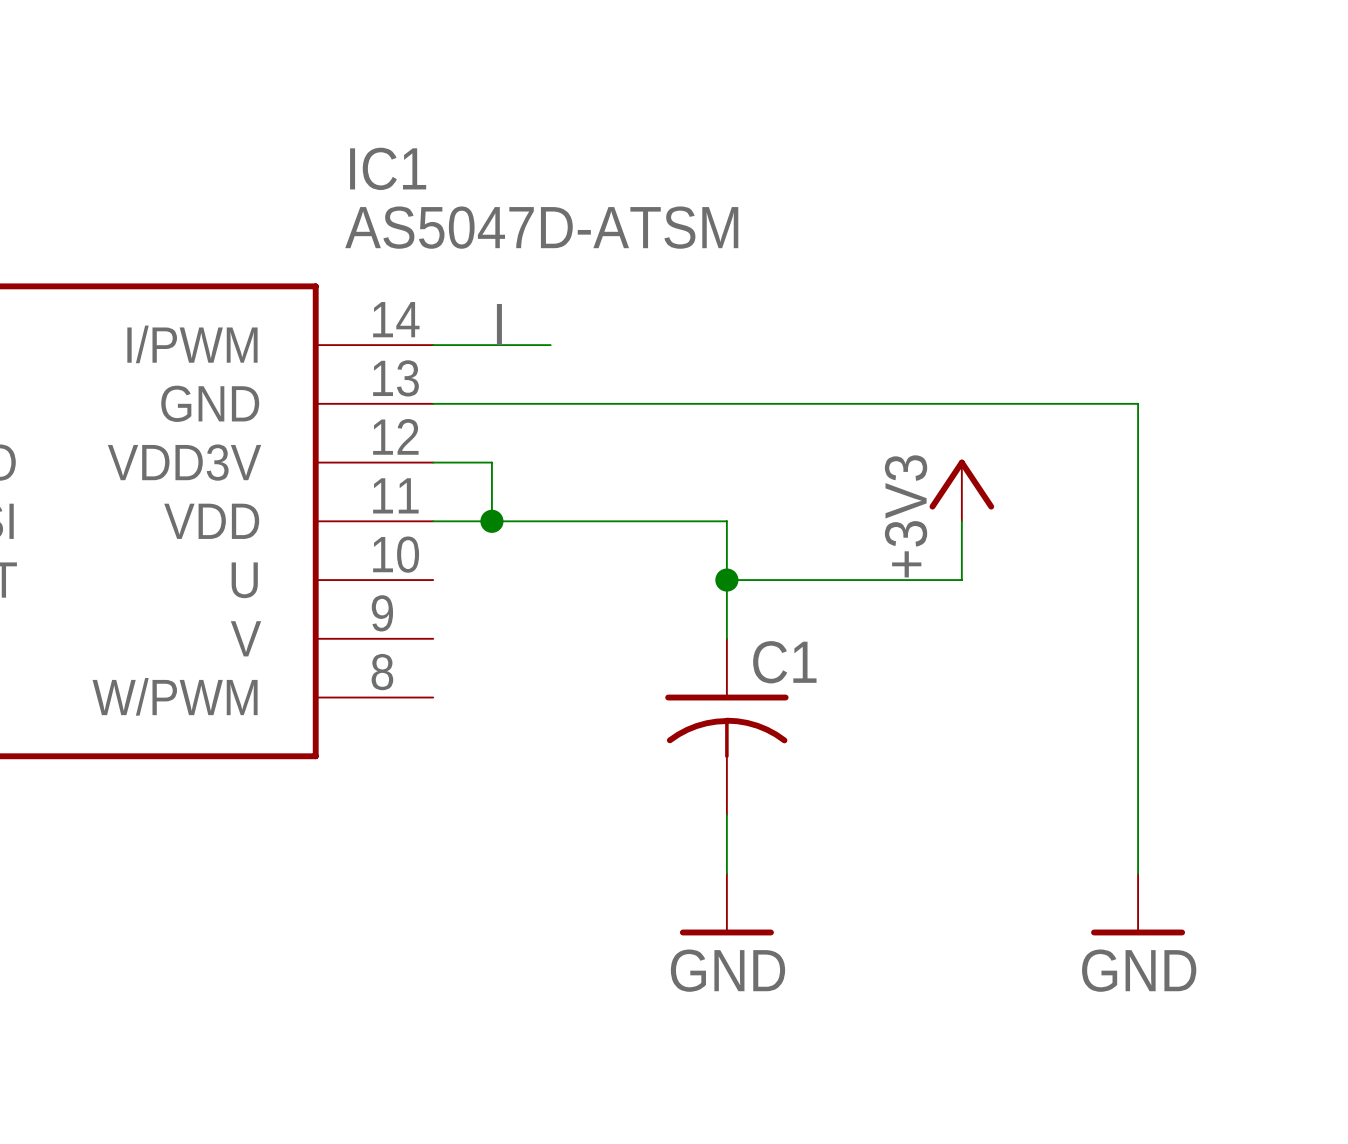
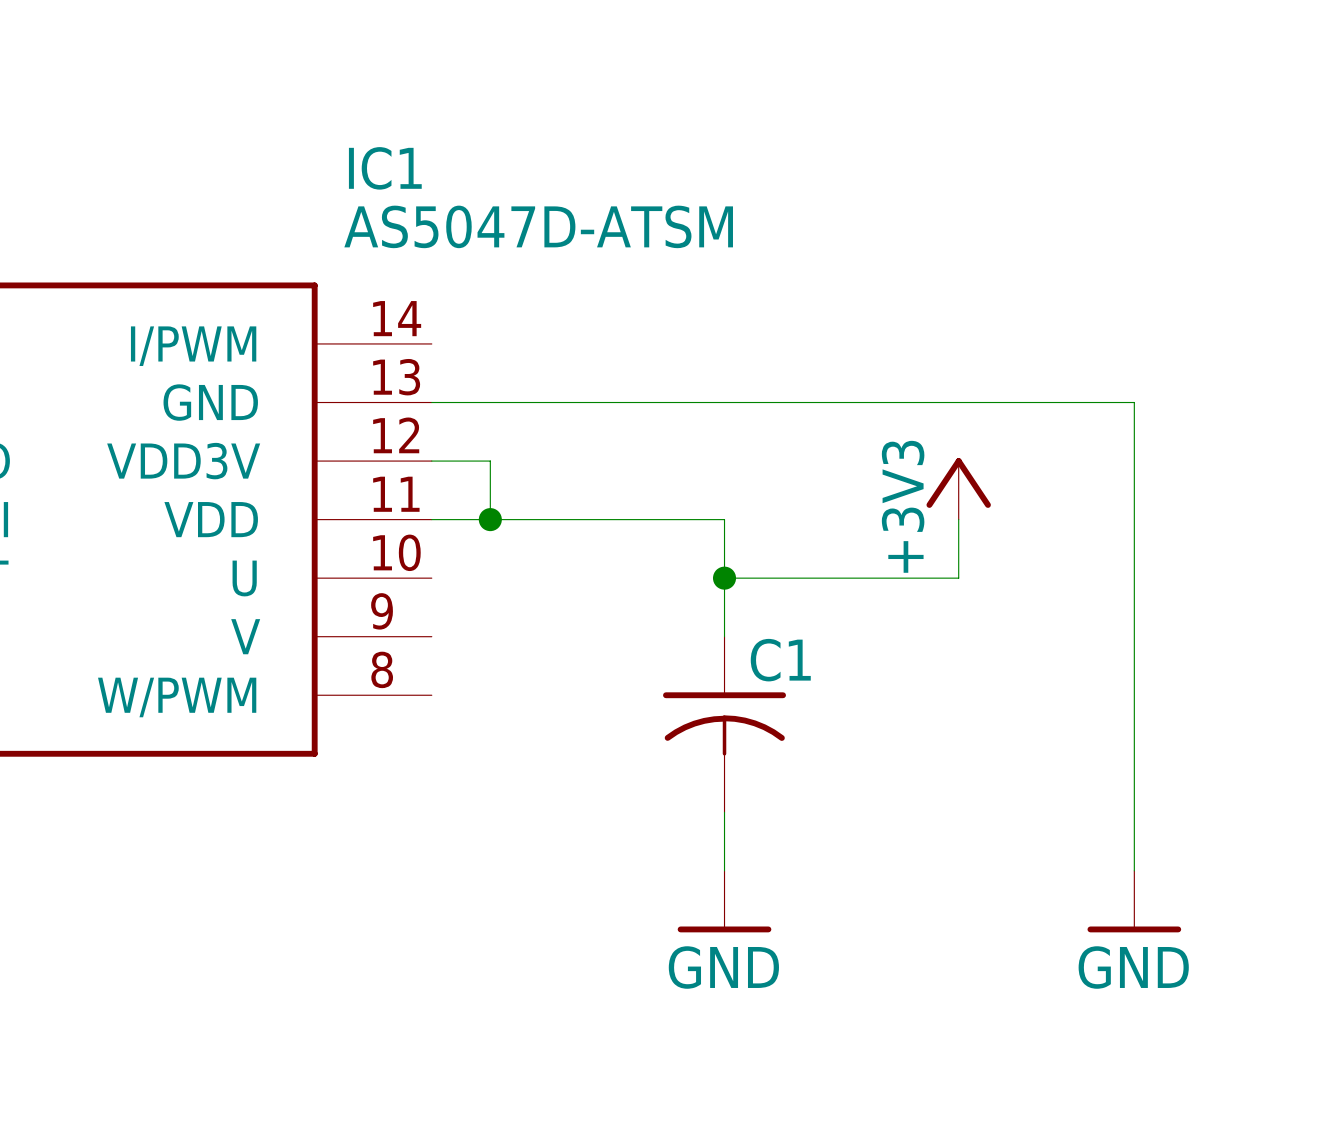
label: I (499, 324) -> none
wire: (433, 345) (550, 345) -> none

